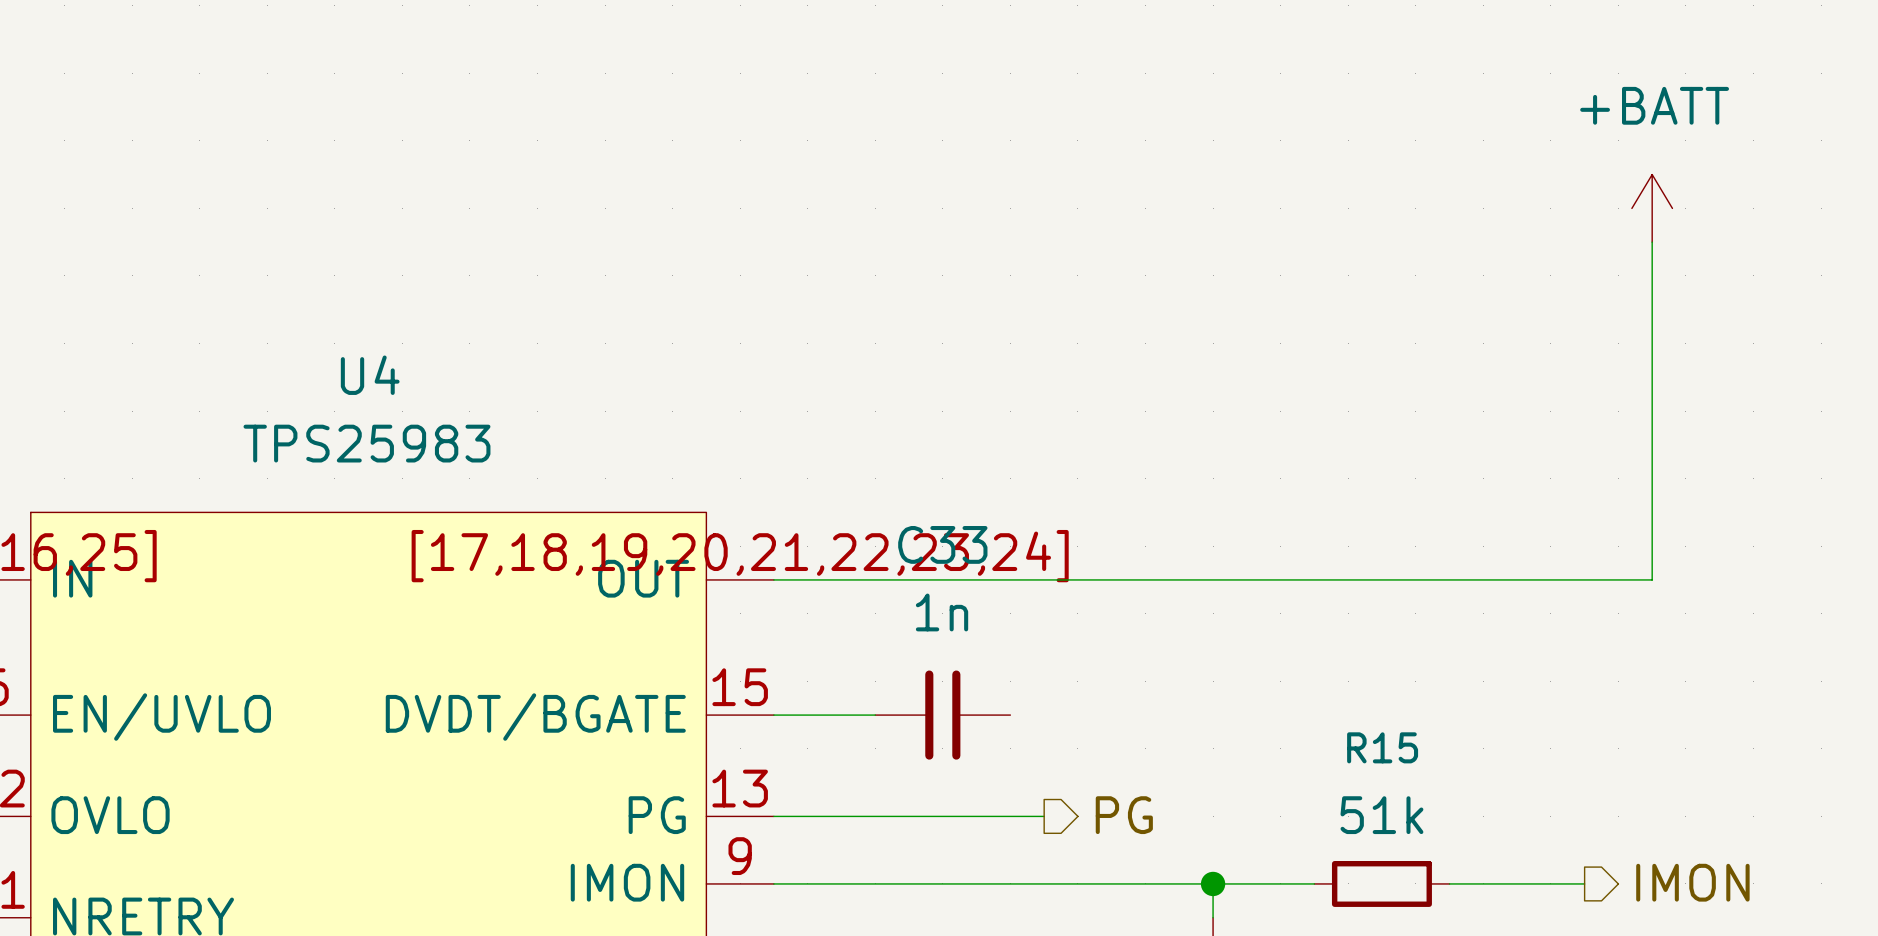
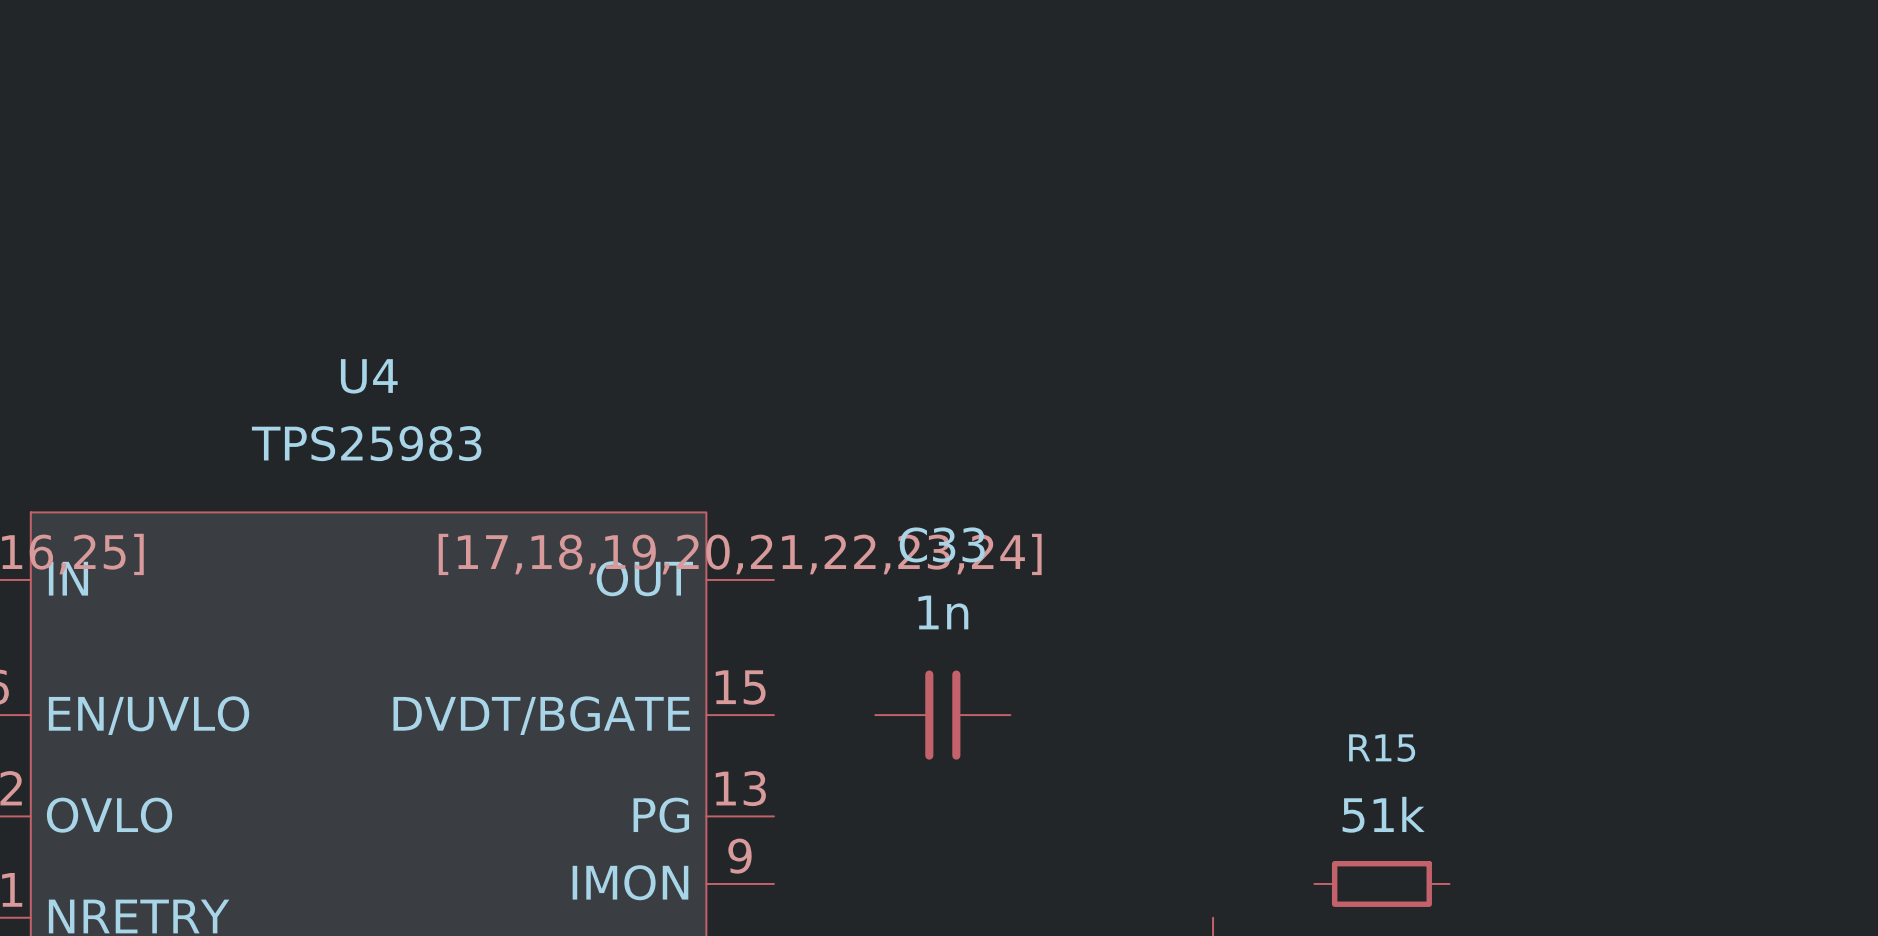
power symbol: +BATT (1652, 208) -> none
wire: (1652, 242) (1652, 579) (773, 579) -> none
wire: (773, 715) (875, 715) -> none
hierarchical label: PG (1124, 815) -> none
wire: (773, 816) (1044, 816) -> none
hierarchical label: IMON (1692, 882) -> none
wire: (773, 883) (1314, 883) -> none
wire: (1213, 883) (1213, 917) -> none
junction: (1213, 883) -> none
wire: (1449, 883) (1584, 883) -> none

